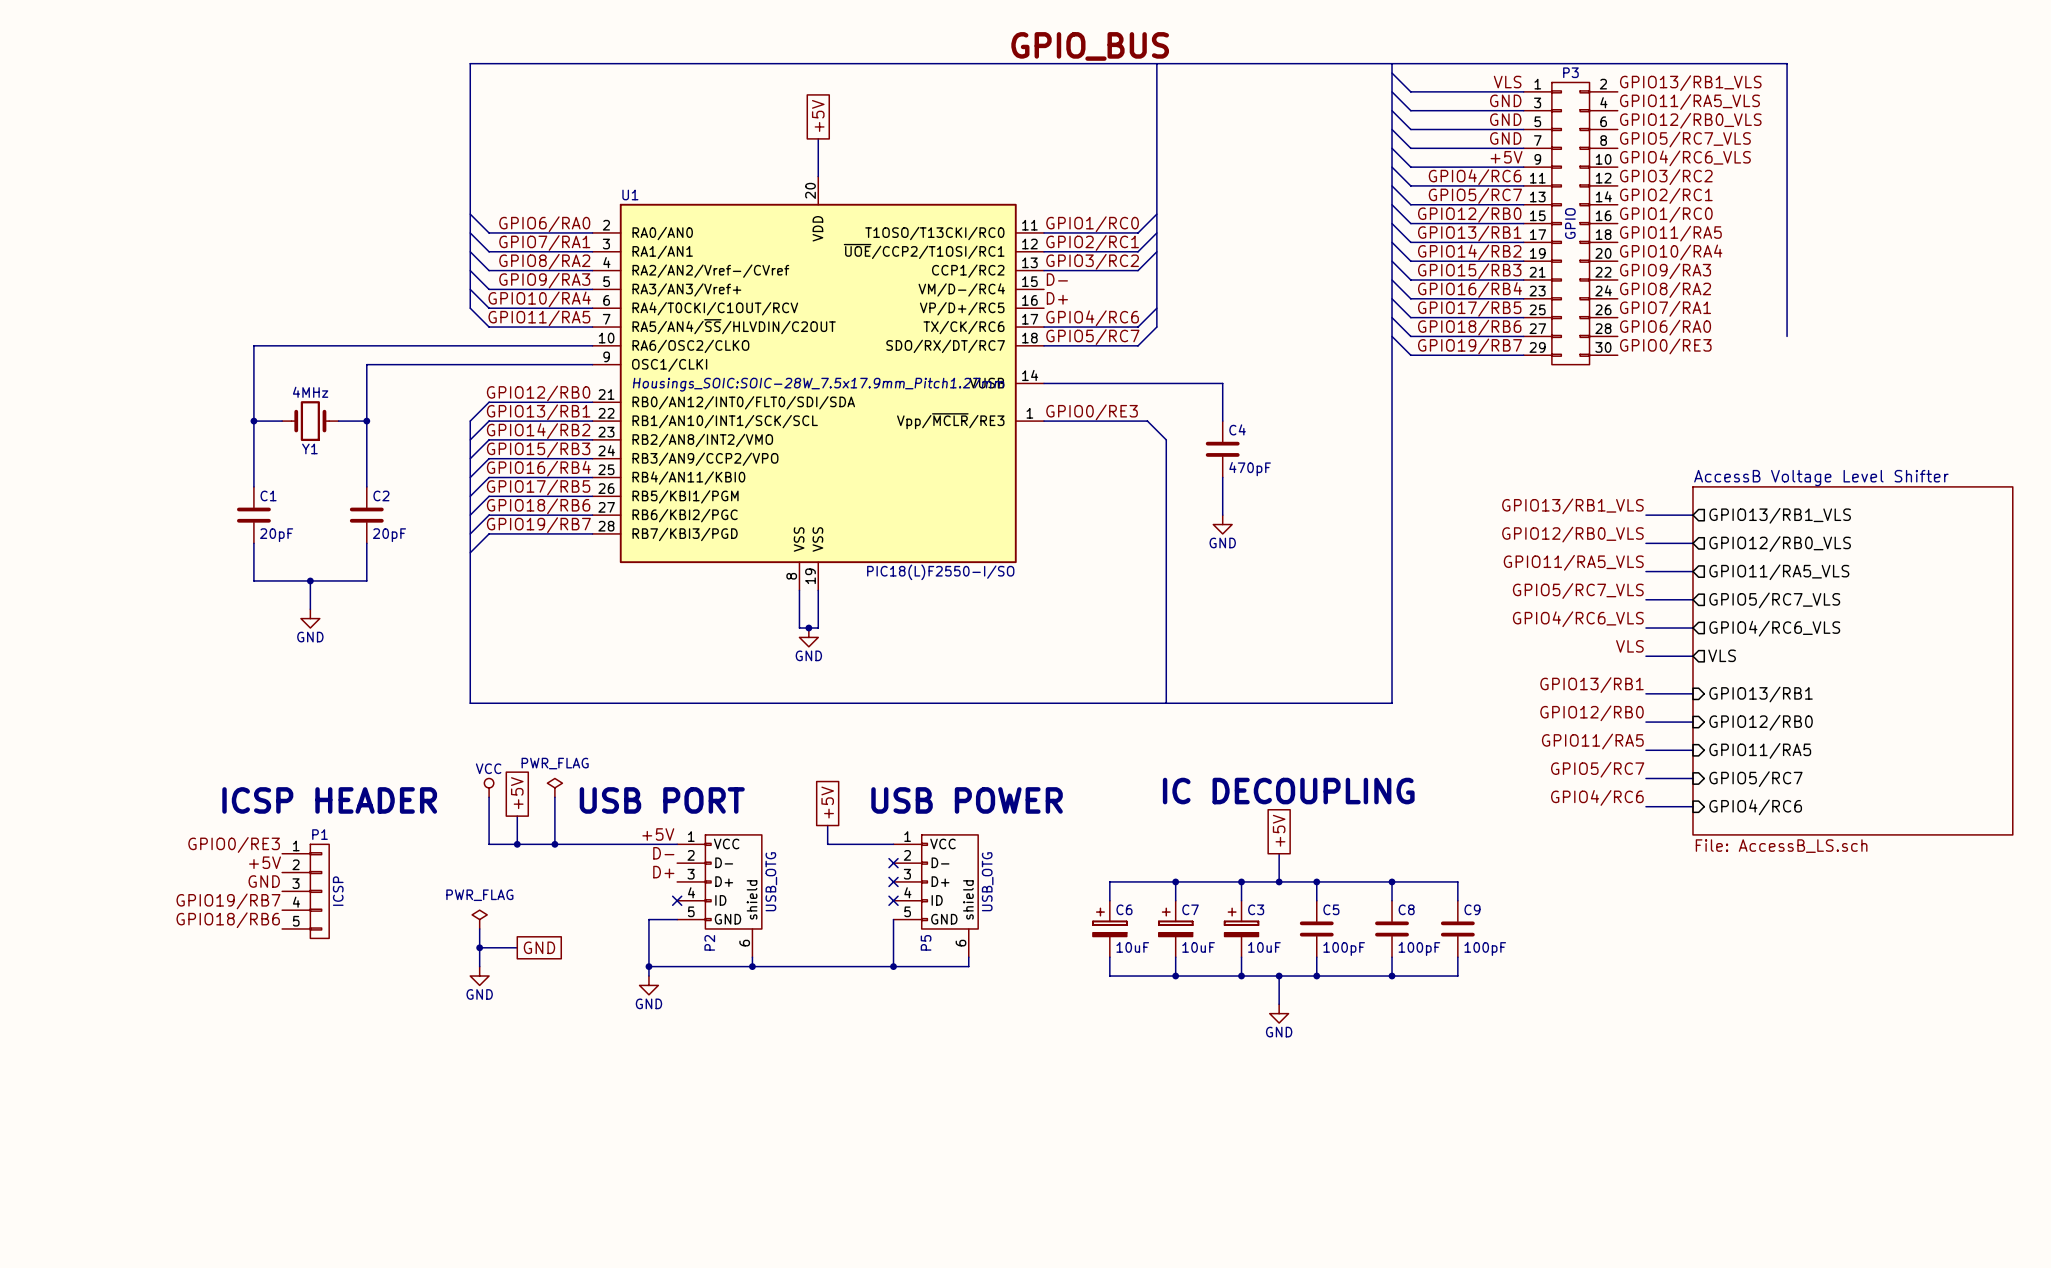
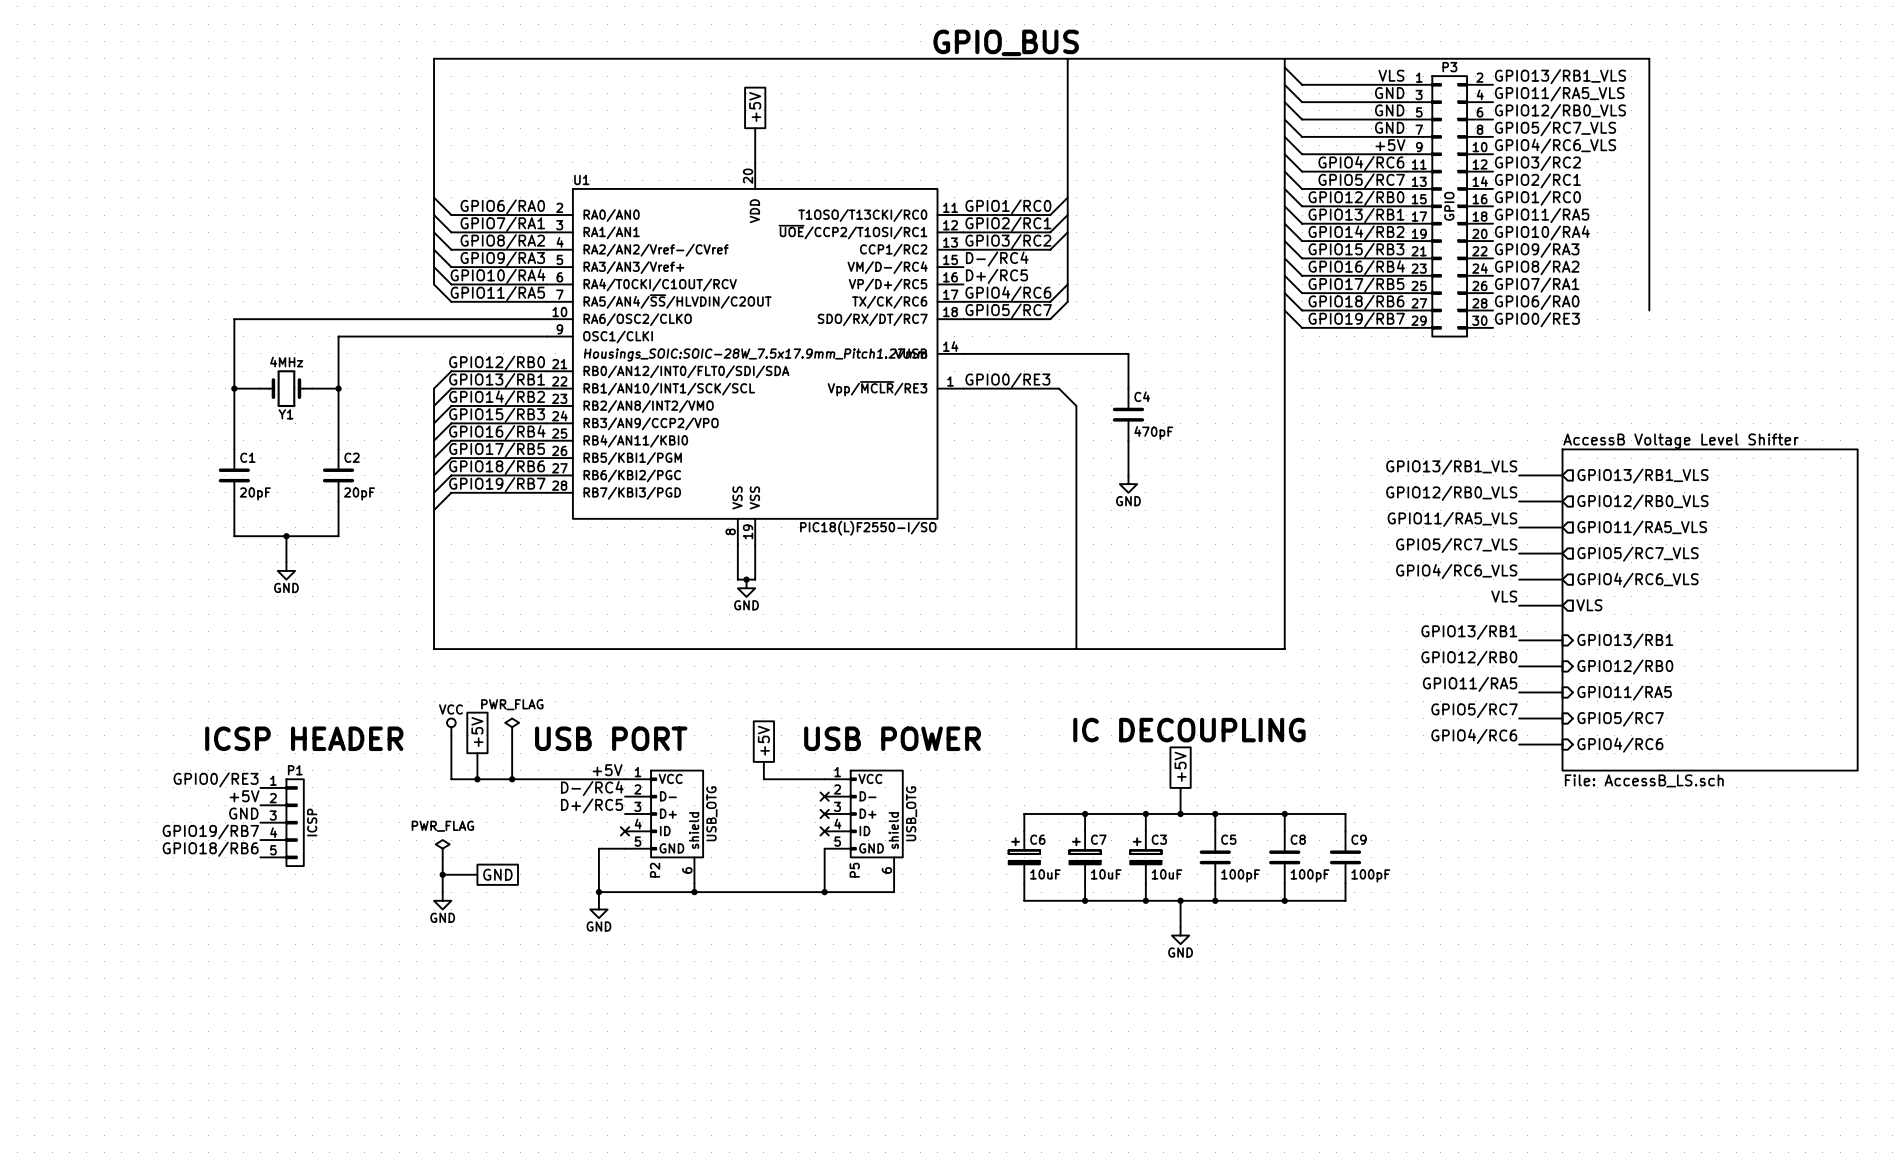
label: D- (1057, 279) -> D-/RC4 (997, 259)
label: D+ (1057, 298) -> D+/RC5 (996, 276)
label: D- (663, 853) -> D-/RC4 (592, 788)
label: D+ (663, 872) -> D+/RC5 (592, 805)

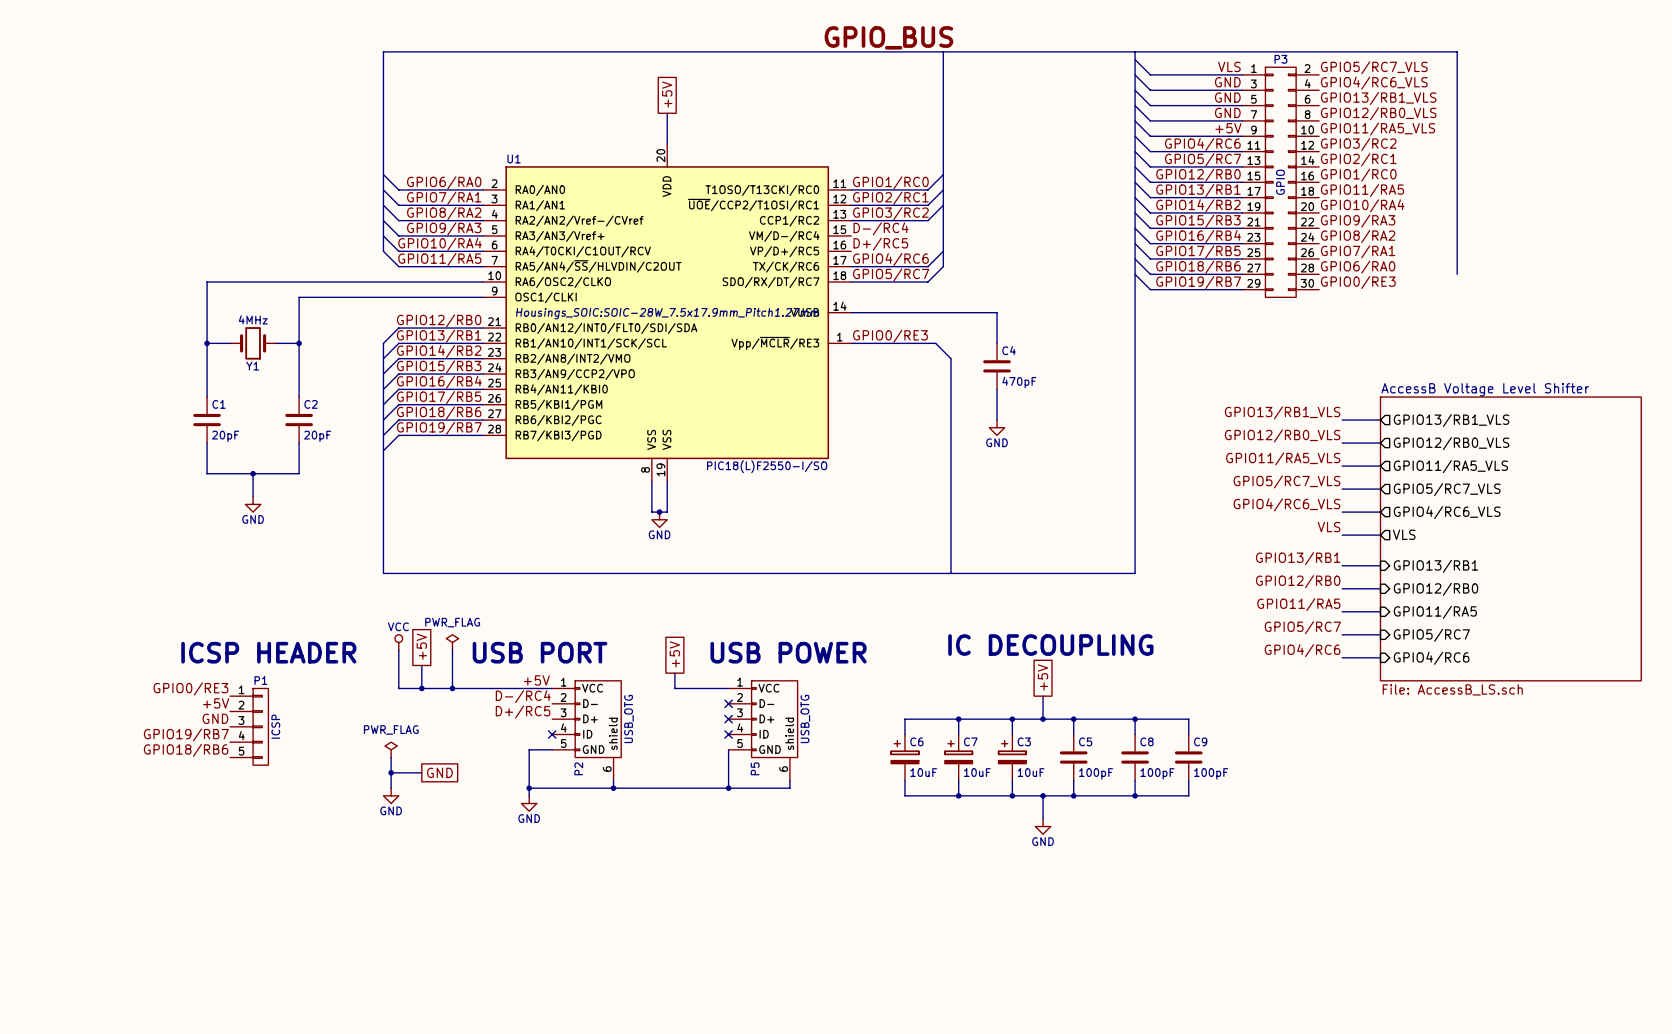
label: GPIO13/RB1_VLS (1560, 76) -> GPIO5/RC7_VLS (1374, 67)
label: GPIO11/RA5_VLS (1559, 94) -> GPIO4/RC6_VLS (1374, 83)
label: GPIO12/RB0_VLS (1560, 111) -> GPIO13/RB1_VLS (1378, 98)
label: GPIO5/RC7_VLS (1555, 128) -> GPIO12/RB0_VLS (1378, 113)
label: GPIO4/RC6_VLS (1555, 146) -> GPIO11/RA5_VLS (1378, 129)

